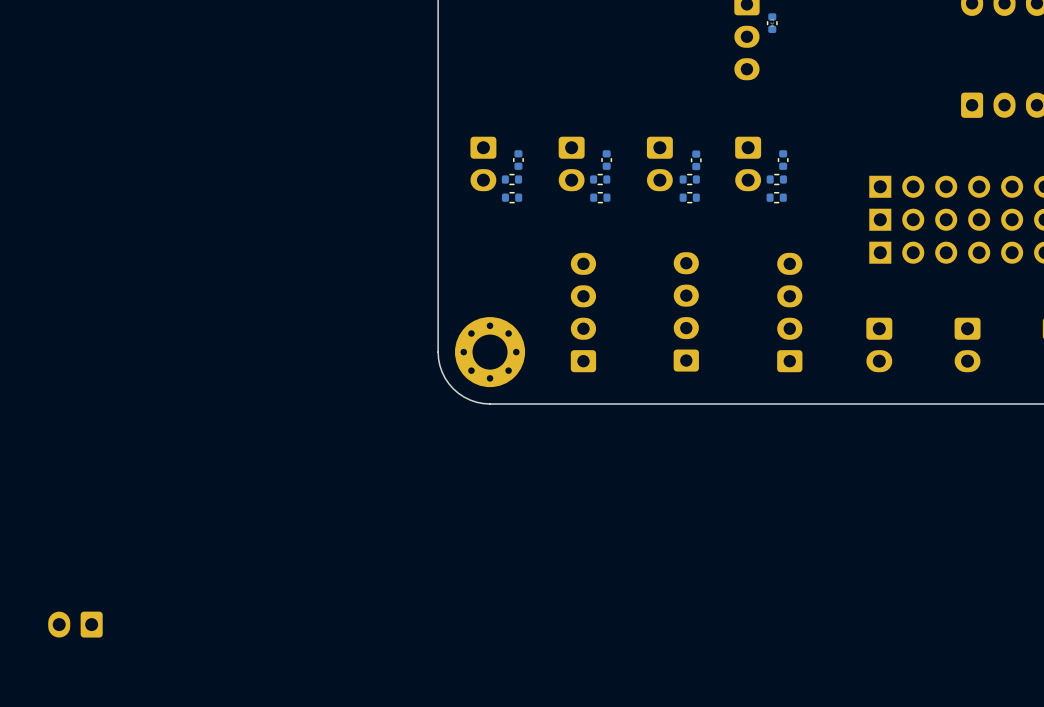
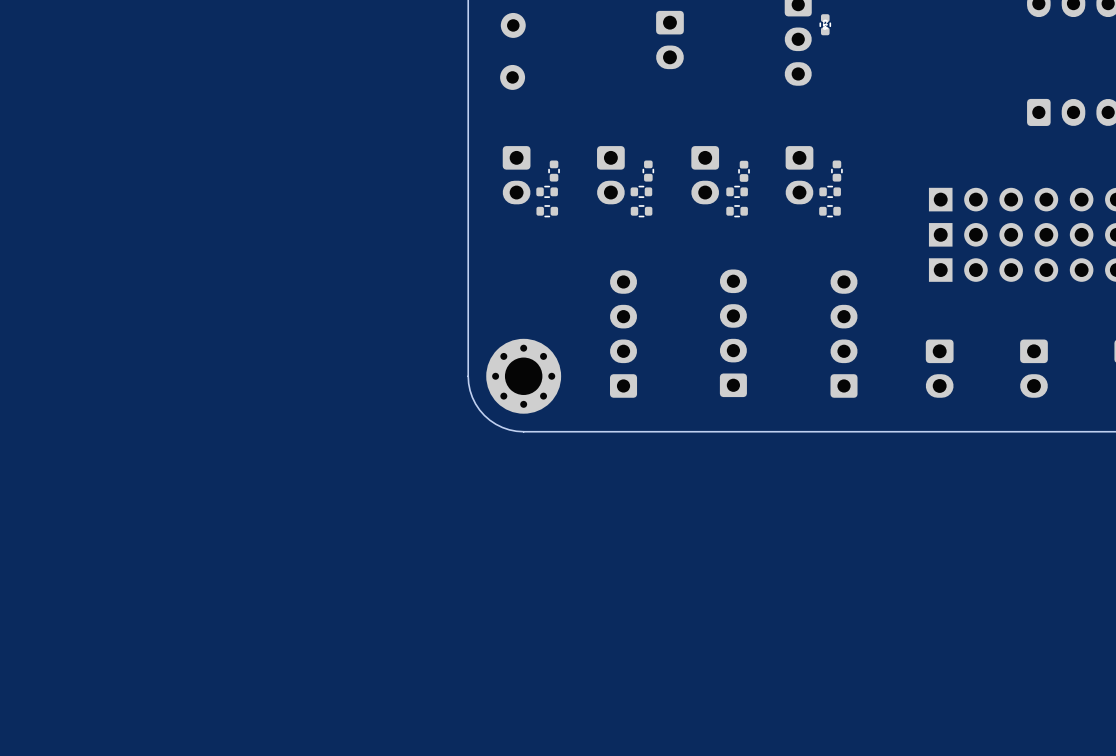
part: none -> (513, 25)
part: none -> (669, 39)
part: none -> (512, 77)
part: (75, 624) -> none

